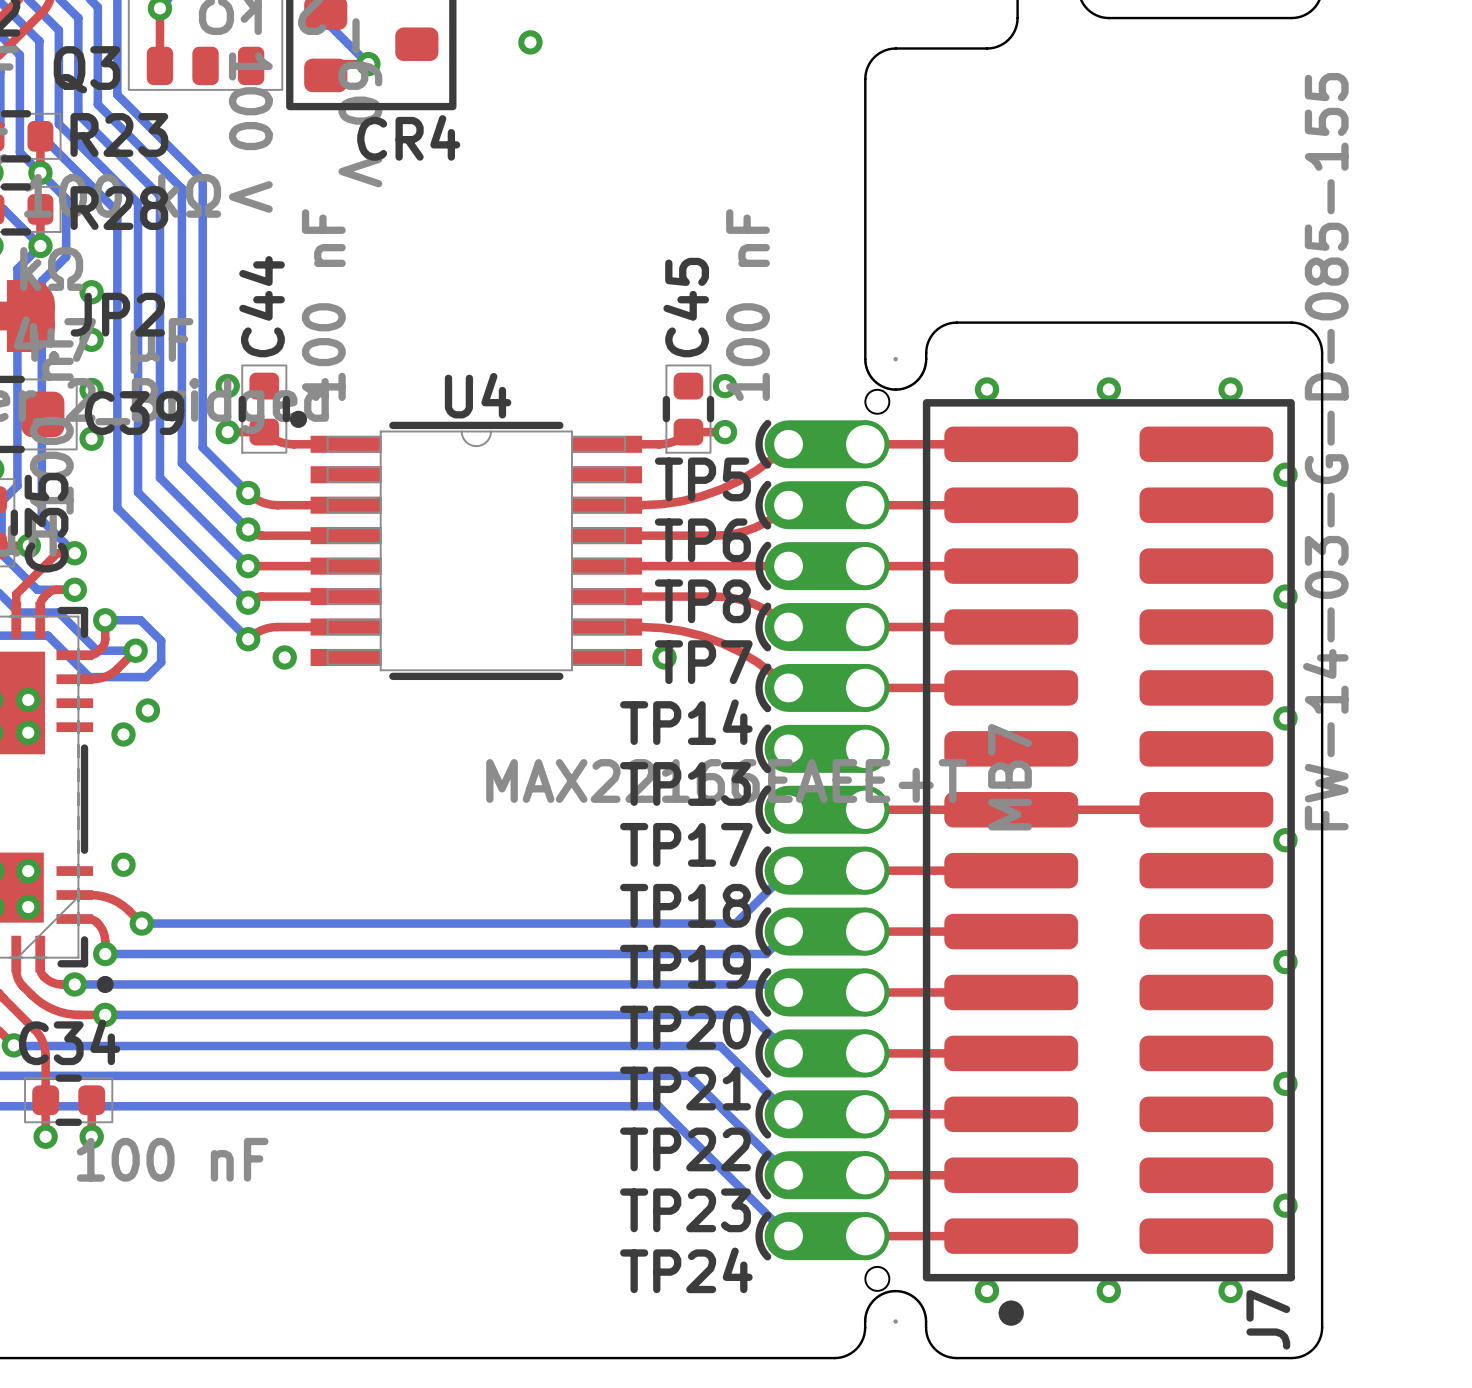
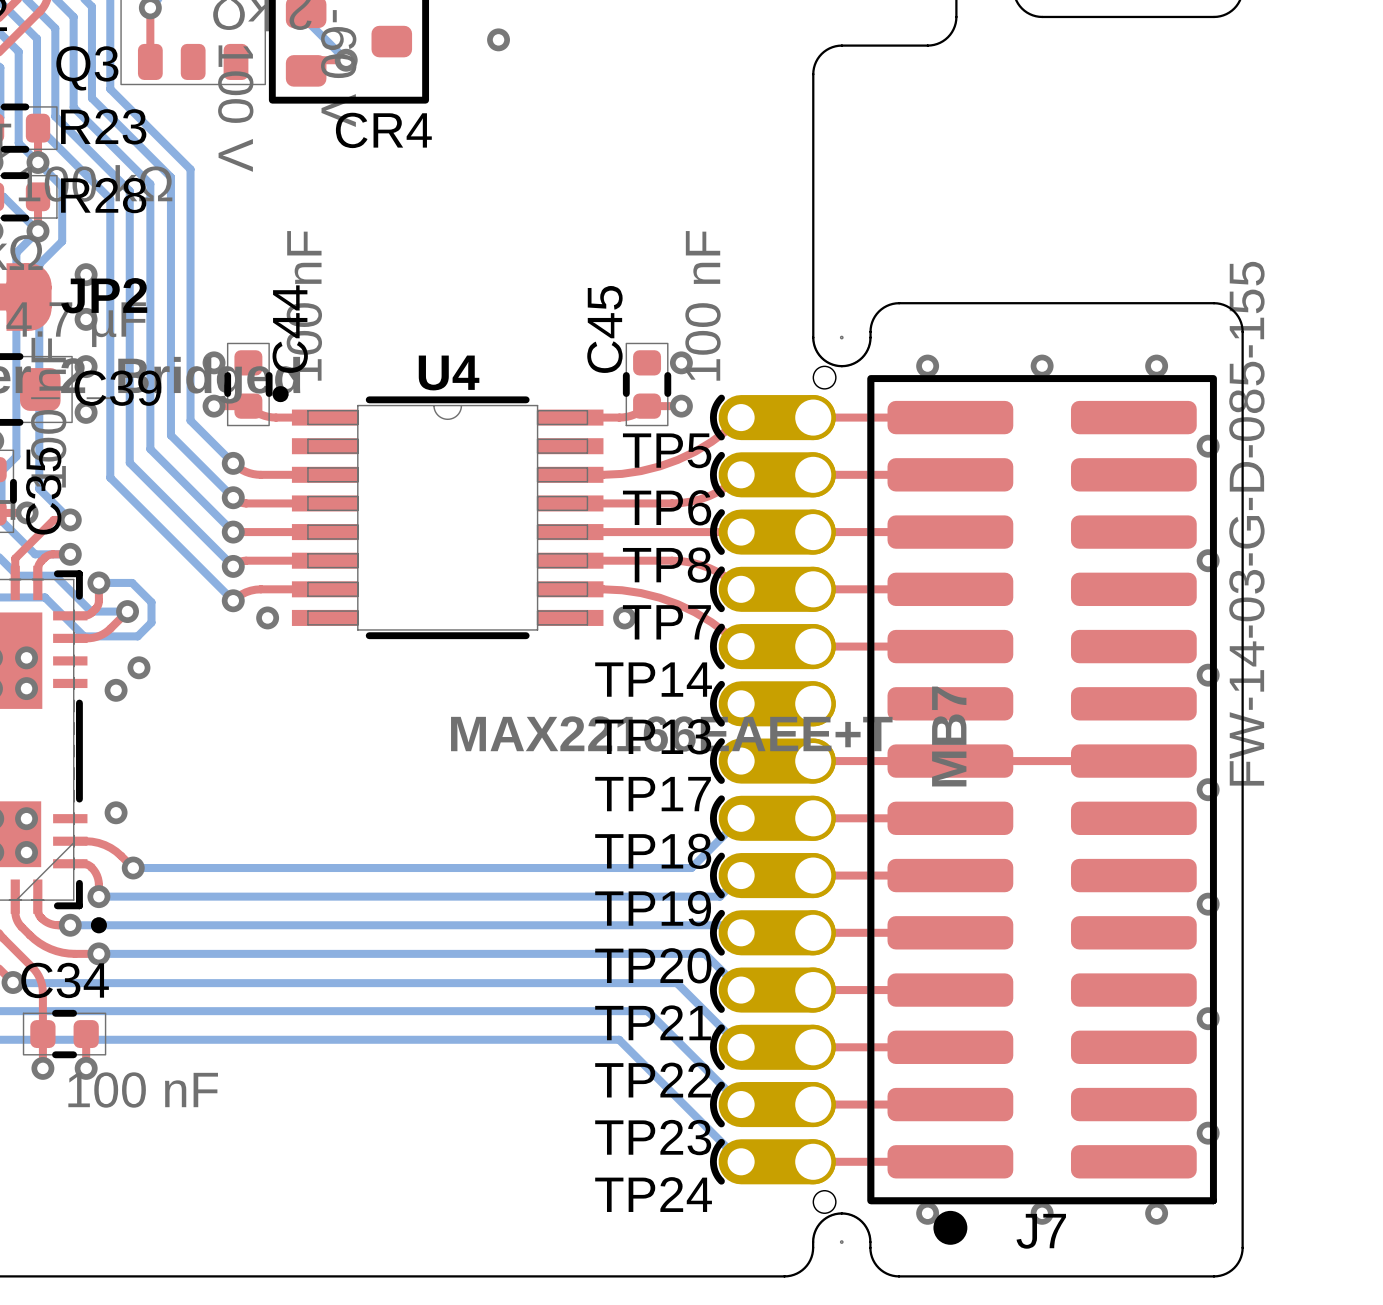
C44 name position: C44 (262, 306) -> C44 (290, 329)
C45 name position: C45 (686, 307) -> C45 (604, 329)
J7 footprint: [922, 399, 1295, 1326] -> [867, 375, 1217, 1245]
J7 name position: J7 (1268, 1319) -> J7 (1041, 1231)

